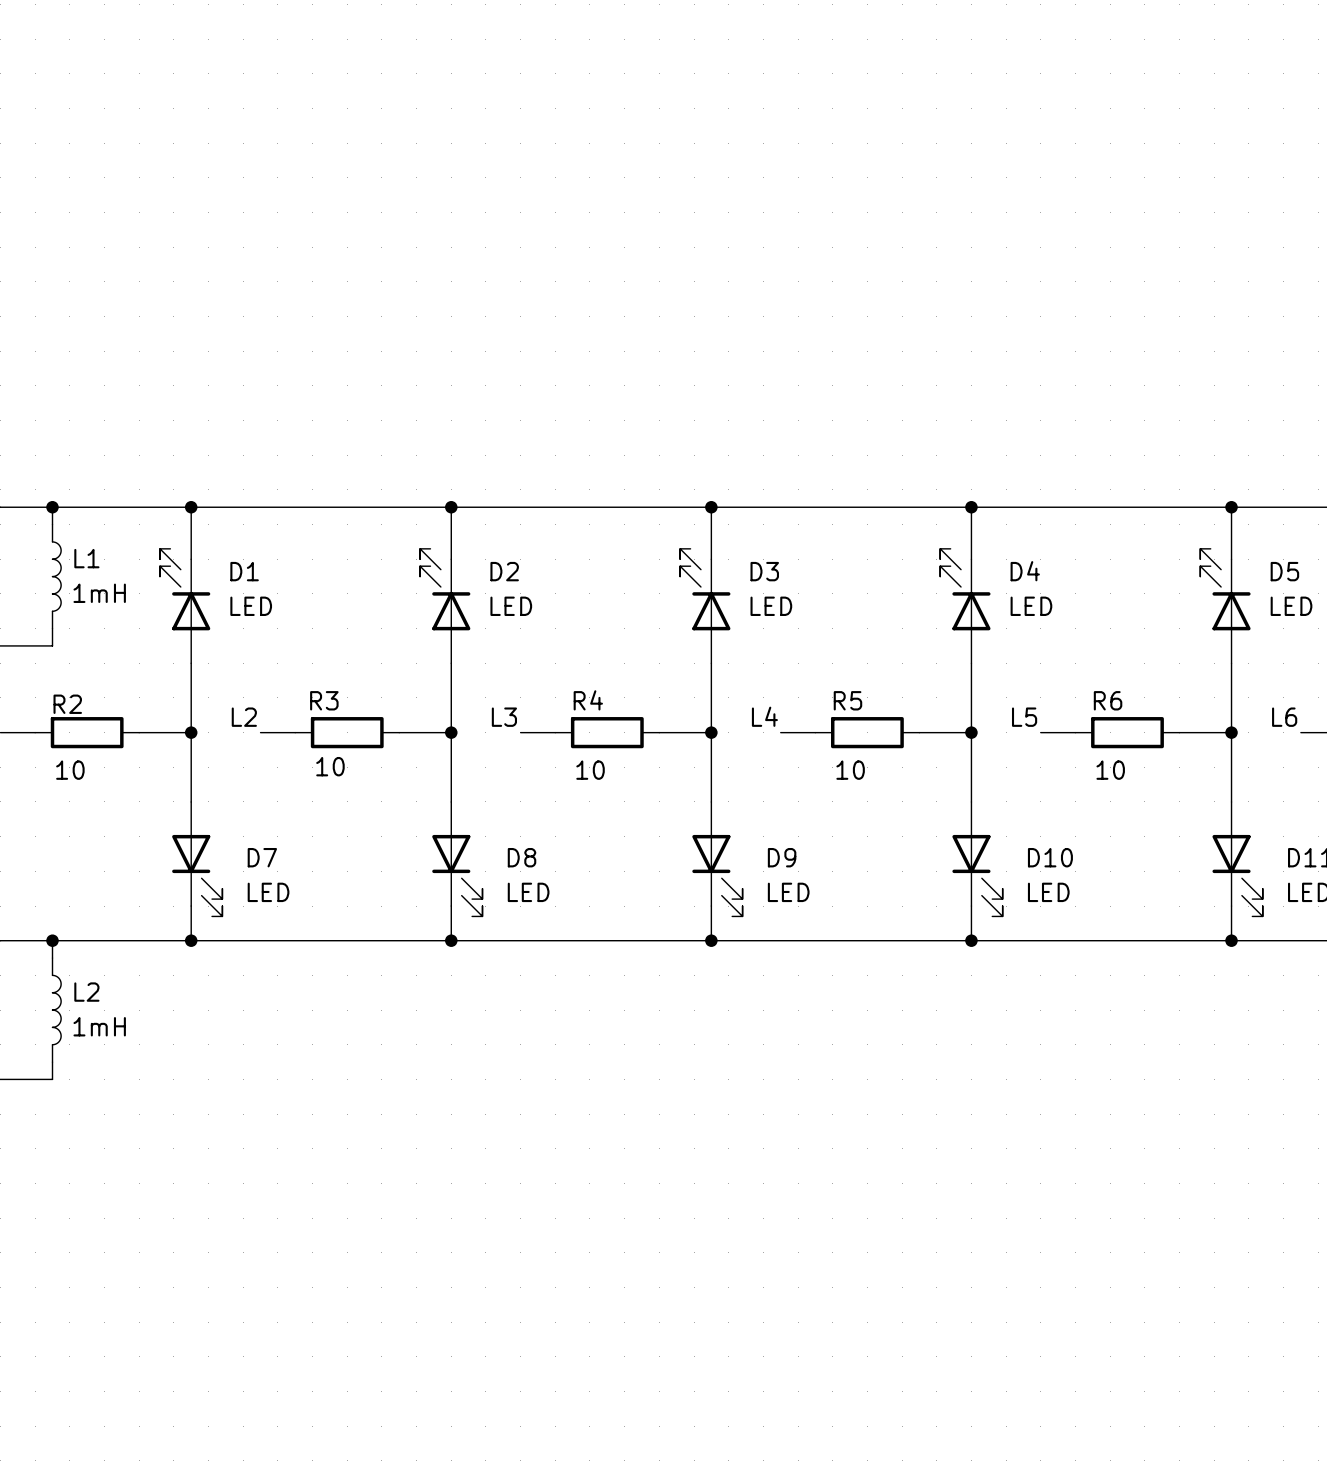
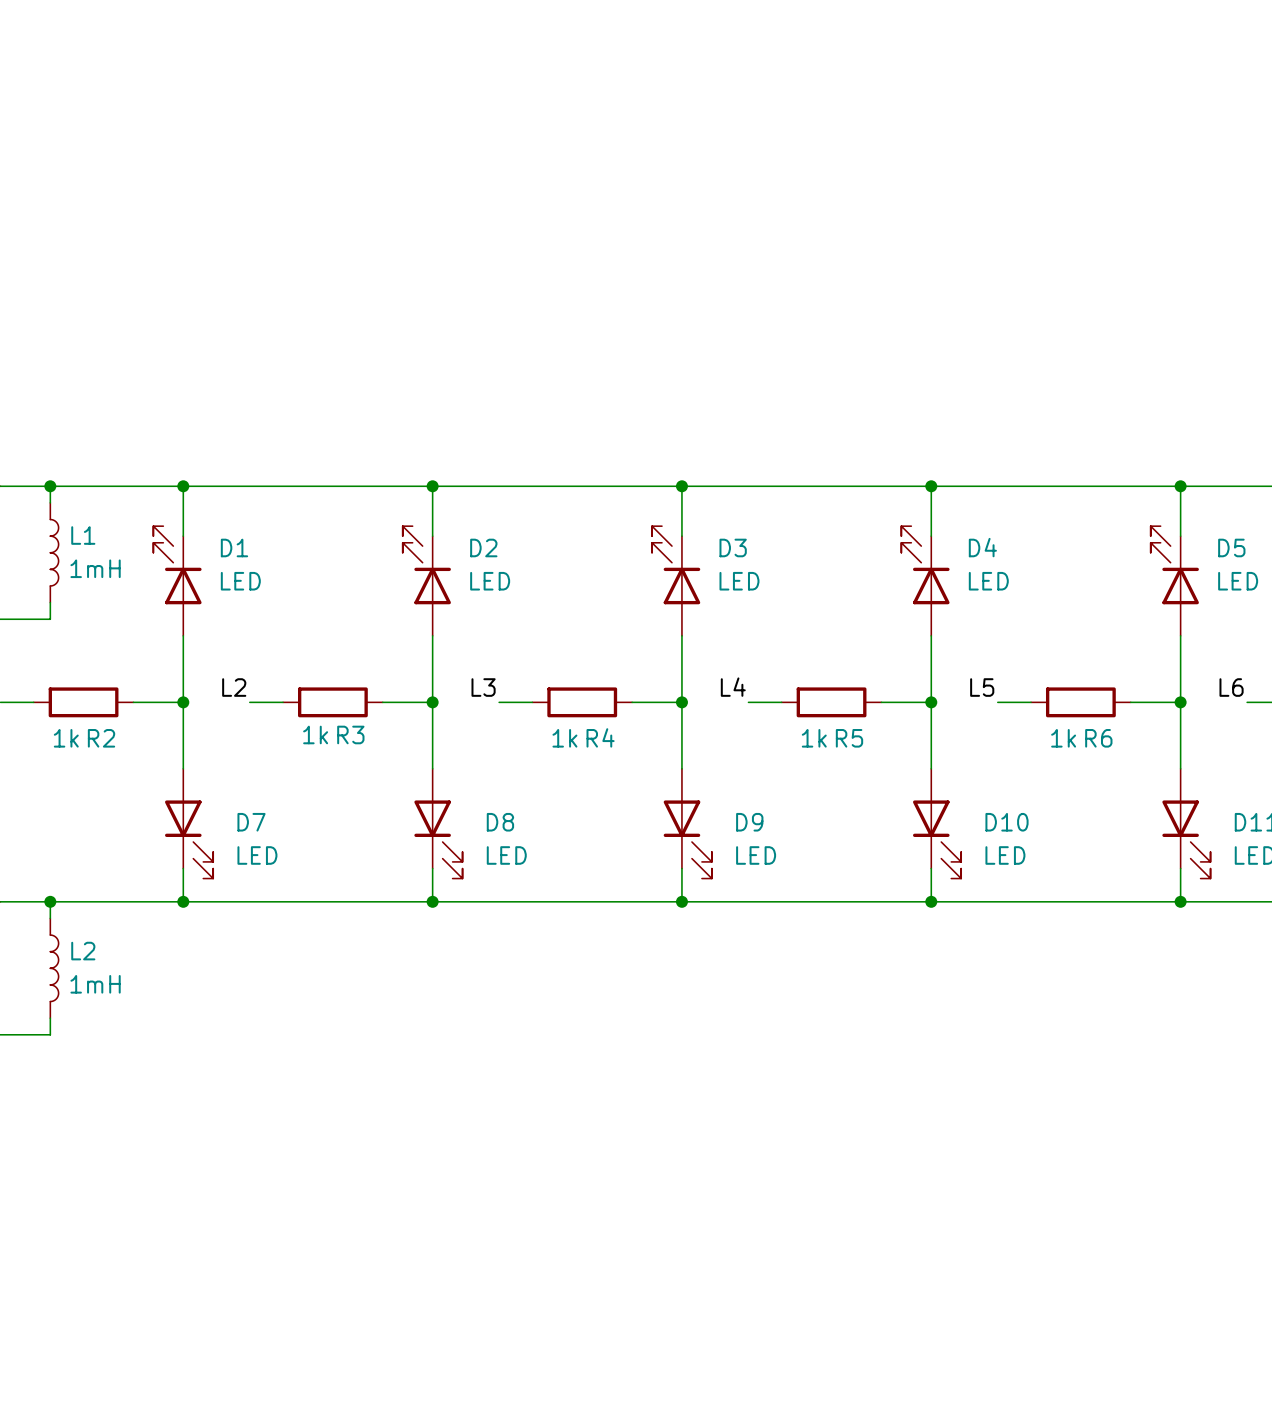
R3 name position: R3 (324, 700) -> R3 (350, 734)
R4 name position: R4 (588, 700) -> R4 (600, 737)
R5 name position: R5 (847, 700) -> R5 (849, 738)
R6 name position: R6 (1108, 700) -> R6 (1098, 738)
R2 name position: R2 (67, 704) -> R2 (101, 738)
R3 value: 10 (330, 766) -> 1k (315, 734)
R2 value: 10 (70, 770) -> 1k (66, 738)
R4 value: 10 (590, 770) -> 1k (564, 738)
R5 value: 10 (850, 770) -> 1k (814, 738)
R6 value: 10 (1110, 770) -> 1k (1063, 738)

